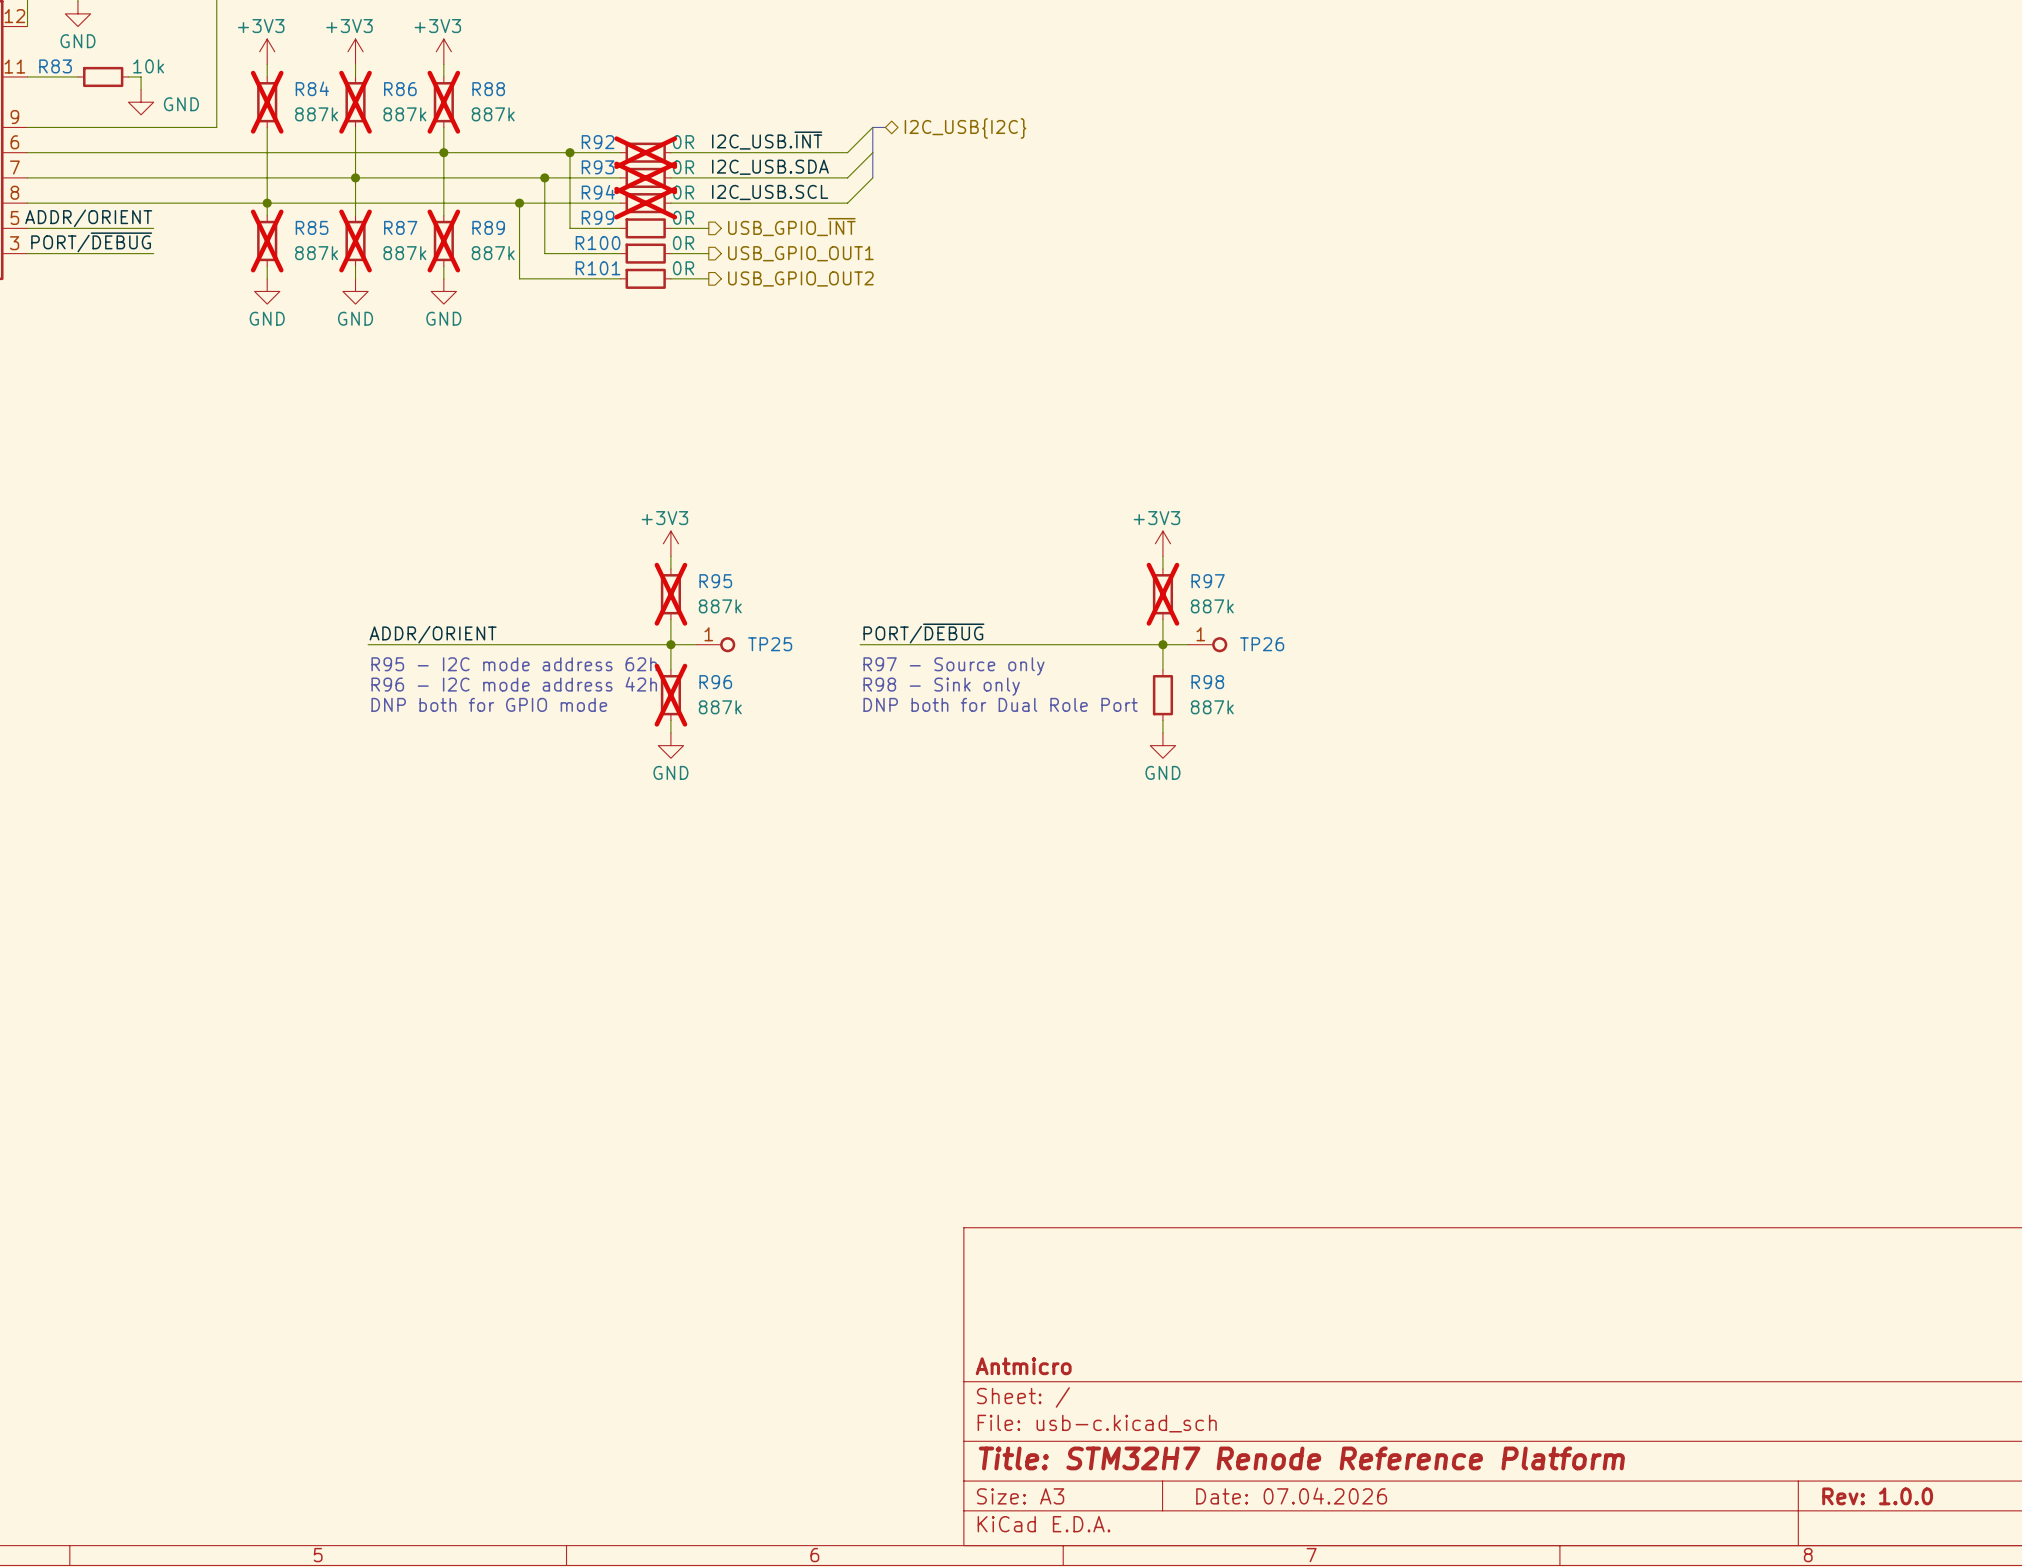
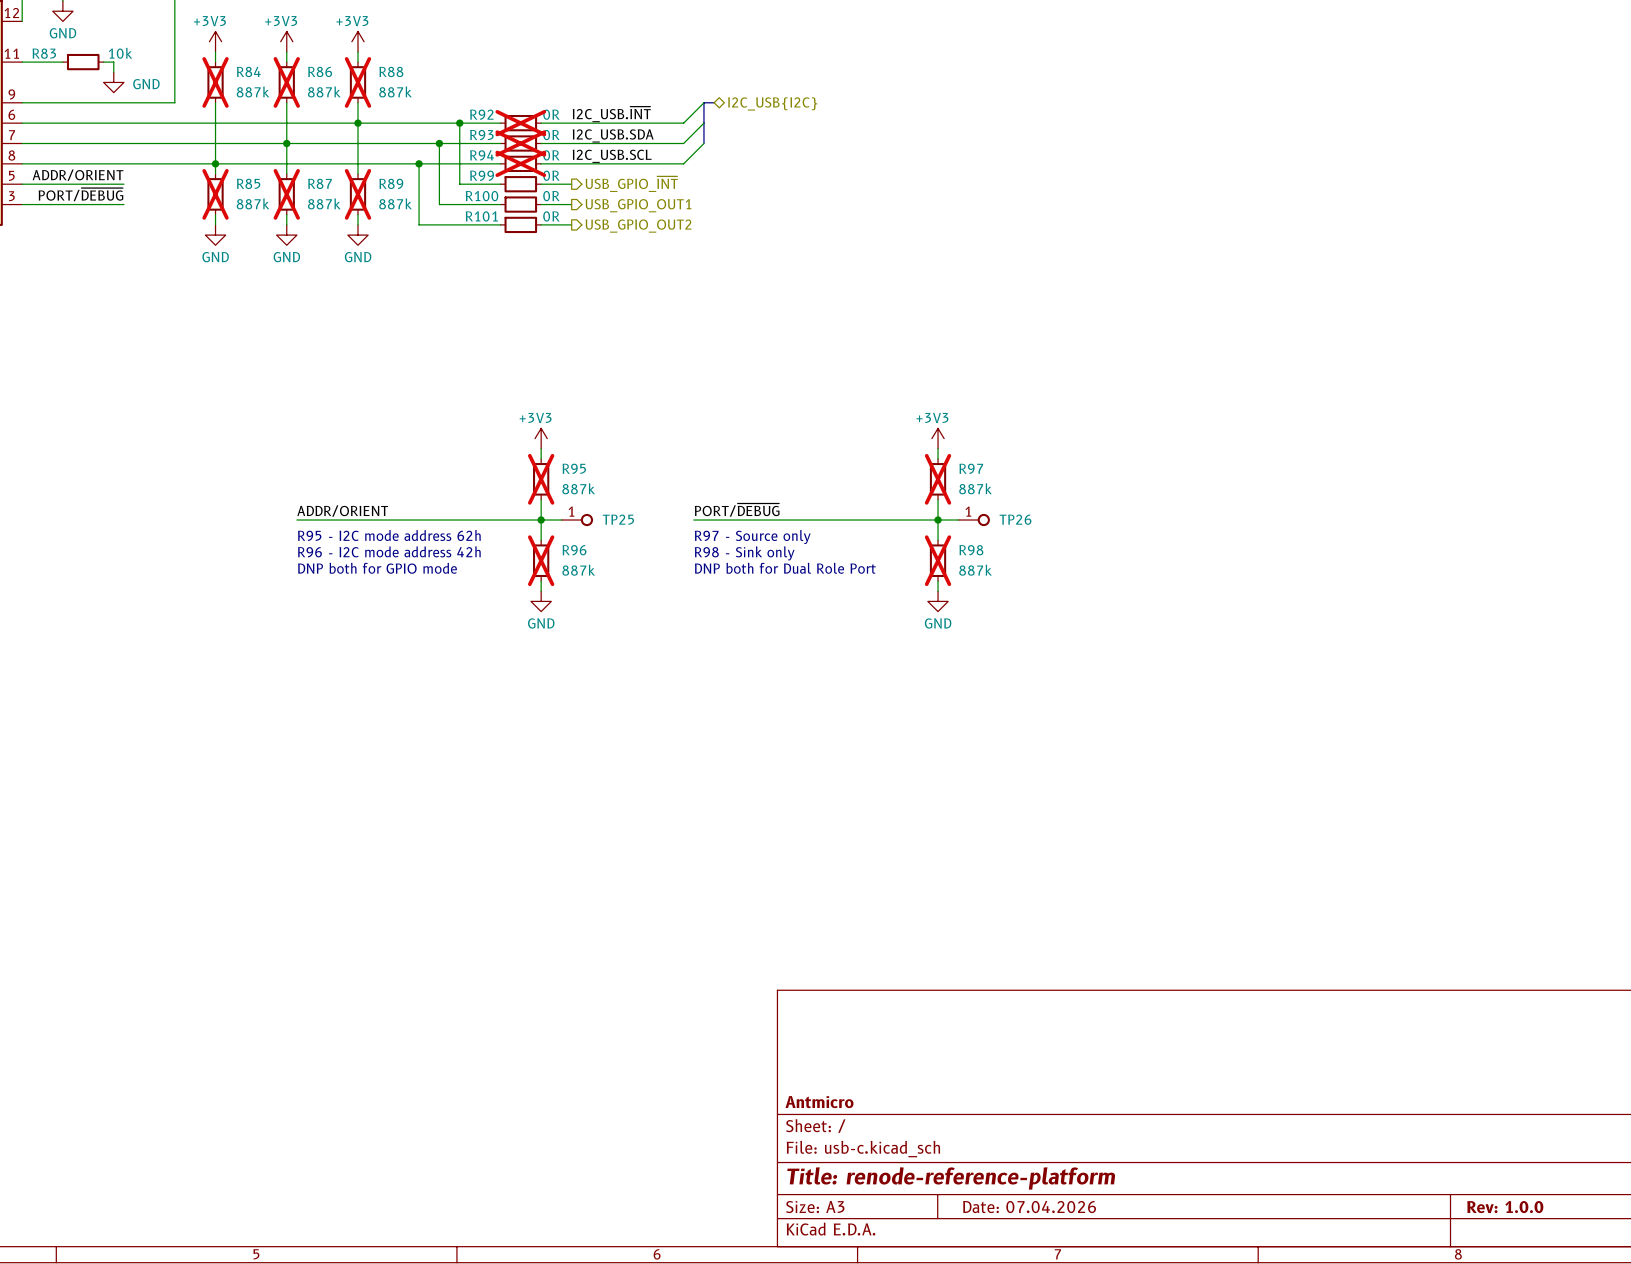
R98 do-not-place cross: none -> (938, 560)
title block: Title: STM32H7 Renode Reference Platform (1301, 1458) -> Title: renode-reference-platform (951, 1178)

